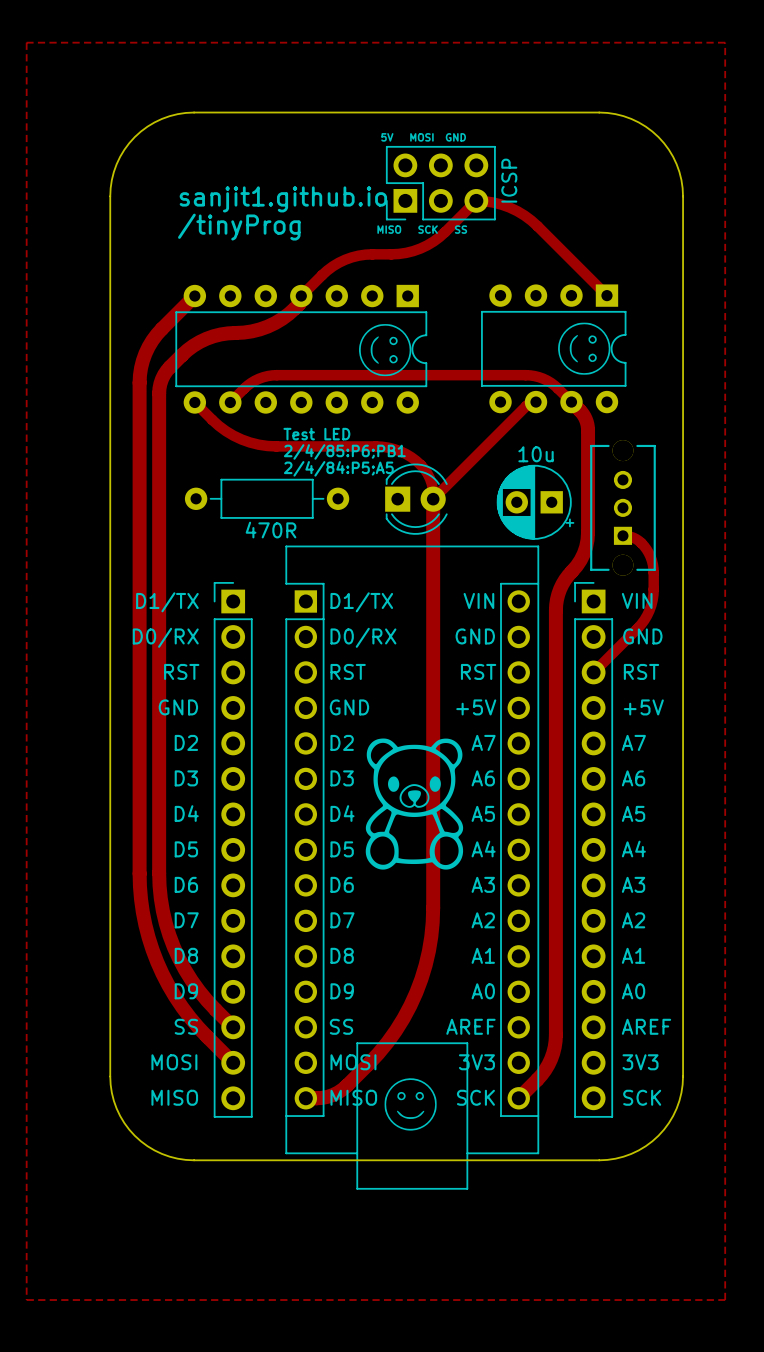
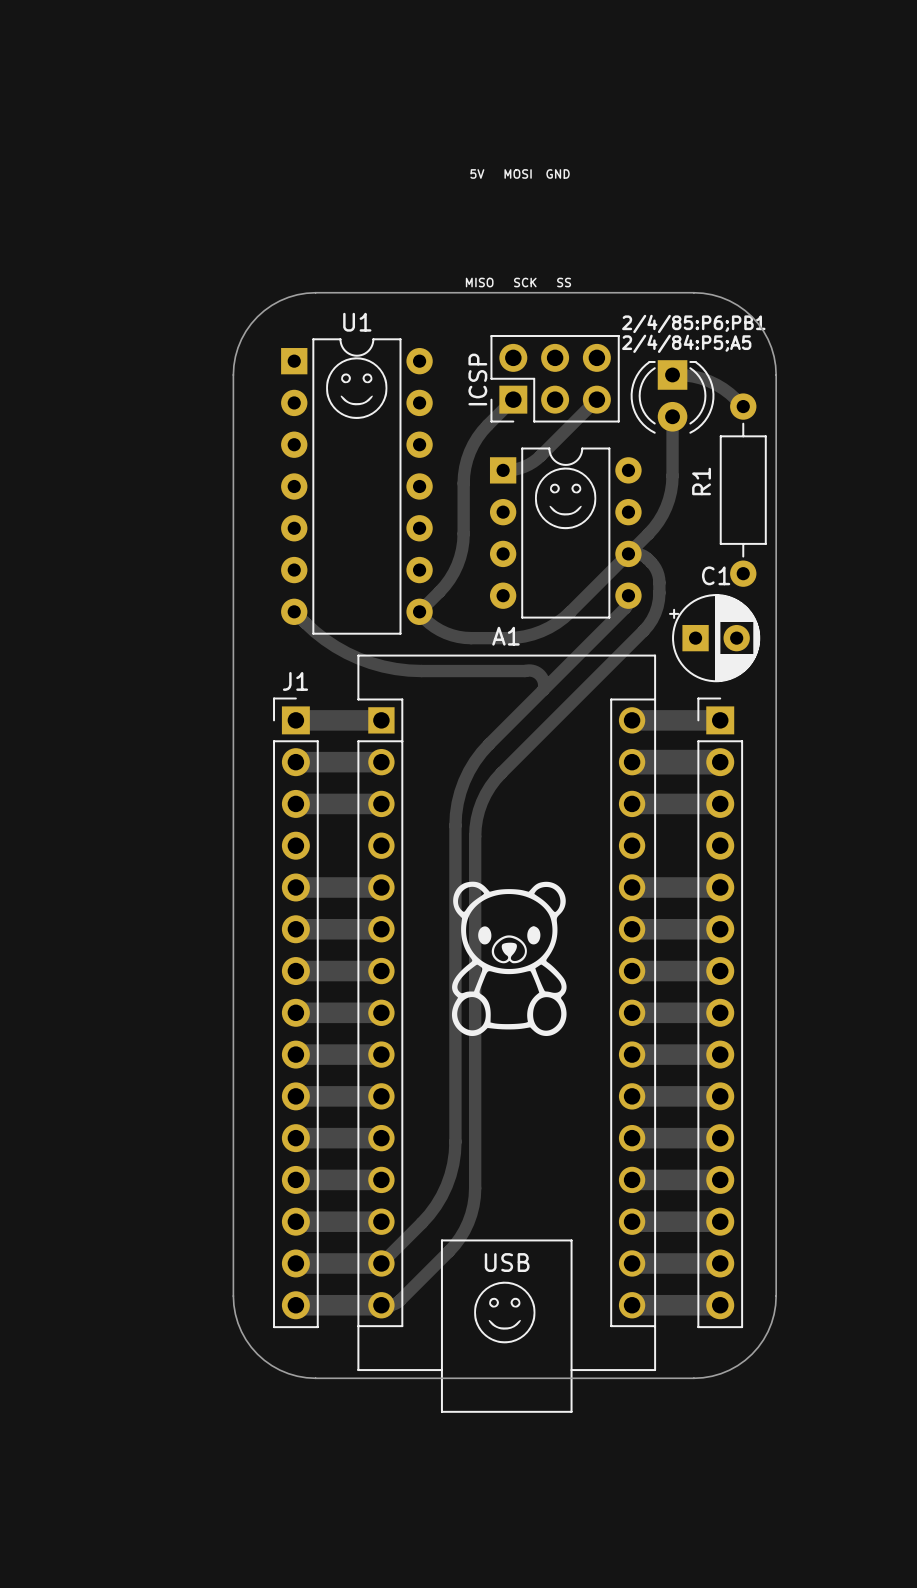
zone outline: (26, 42) (725, 42) (725, 1300) (26, 1300) (26, 42) -> none
part value position: ICSP (509, 180) -> ICSP (477, 379)
part position: (440, 183) -> (555, 378)
text: sanjit1.github.io (283, 199) -> none
text: /tinyProg (239, 227) -> none
drawing: none -> [326, 357, 388, 419]
track: (606, 295) (524, 215) (501, 204) (476, 200) (439, 237) (427, 245) (406, 252) (365, 254) (338, 262) (322, 275) (302, 294) (299, 304) (282, 318) (259, 329) (220, 334) (199, 341) (181, 355) (164, 374) (159, 393) (159, 873) (160, 898) (169, 935) (185, 969) (207, 1000) (233, 1027) -> (381, 1221) (295, 1221)
track: (194, 296) (152, 340) (145, 353) (139, 375) (139, 886) (148, 937) (168, 985) (189, 1017) (233, 1062) -> (387, 1263) (295, 1263)
track: none -> (672, 374) (693, 376) (709, 381) (723, 388) (743, 406)
drawing: [558, 322, 611, 375] -> none
drawing: [359, 324, 412, 377] -> none
track: none -> (513, 399) (482, 431) (469, 451) (464, 475) (463, 533) (460, 557) (453, 572) (444, 585) (419, 611) (434, 627) (458, 636) (515, 637) (533, 634) (549, 627) (570, 611) (648, 533) (662, 514) (670, 491) (672, 416)
track: none -> (596, 399) (537, 459) (520, 468) (503, 470)
part rotation: 0° (553, 348) -> 90° counterclockwise (565, 533)
part position: (553, 348) -> (565, 533)
part: (301, 349) -> none
drawing: none -> [534, 467, 597, 530]
track: (194, 402) (225, 431) (241, 439) (258, 444) (375, 446) (400, 451) (416, 460) (427, 473) (432, 489) (432, 500) -> none
U1: none -> (356, 486)
track: (536, 402) (526, 406) (433, 499) (433, 907) (428, 951) (421, 978) (410, 1005) (387, 1042) (342, 1089) (327, 1096) (311, 1098) -> (628, 553) (644, 556) (657, 571) (659, 582) (658, 599) (652, 619) (643, 630) (501, 773) (485, 794) (479, 810) (475, 836) (475, 1188) (473, 1205) (464, 1230) (454, 1245) (398, 1301) (388, 1305)
track: (571, 402) (583, 414) (587, 427) (588, 532) (583, 553) (562, 584) (556, 604) (555, 1041) (553, 1053) (545, 1070) (518, 1098) -> (720, 1305) (632, 1305)
track: (571, 402) (551, 382) (530, 375) (276, 375) (254, 380) (230, 402) -> none
R1: none -> (743, 490)
text: Test LED (316, 434) -> none
text position: 2/4/85:P6;PB1 (344, 451) -> 2/4/85:P6;PB1 (693, 323)
text position: 2/4/84:P5;A5 (338, 468) -> 2/4/84:P5;A5 (686, 343)
track: none -> (628, 595) (628, 603) (625, 608) (481, 752) (464, 781) (457, 803) (455, 825) (455, 1141) (453, 1164) (446, 1185) (436, 1205) (421, 1223) (381, 1263)
part: 470R (267, 498) -> none
part rotation: 0° (416, 499) -> 90° clockwise (672, 396)
part position: (416, 499) -> (672, 396)
part: 10u (535, 502) -> none
part: (622, 507) -> none
track: none -> (294, 611) (324, 639) (346, 653) (370, 662) (408, 670) (532, 670) (542, 677) (543, 689)
A1 name: none -> A1 (505, 636)
C1: none -> (714, 638)
track: (622, 535) (638, 540) (650, 556) (653, 572) (652, 600) (647, 615) (641, 624) (593, 672) -> (632, 803) (720, 803)
J1 name: none -> J1 (295, 681)
text: VIN (478, 600) -> none
text: VIN (637, 600) -> none
track: none -> (295, 720) (381, 720)
track: none -> (632, 720) (720, 720)
text: D1/TX (167, 602) -> none
text: D1/TX (361, 602) -> none
track: none -> (295, 762) (381, 762)
text: GND (475, 636) -> none
track: none -> (632, 762) (720, 762)
text: GND (642, 636) -> none
text: D0/RX (165, 637) -> none
text: D0/RX (363, 637) -> none
text: RST (181, 671) -> none
text: RST (348, 671) -> none
text: RST (478, 671) -> none
text: RST (641, 671) -> none
track: none -> (295, 803) (381, 803)
text: GND (178, 707) -> none
text: GND (349, 707) -> none
text: +5V (476, 707) -> none
text: +5V (643, 707) -> none
text: D2 (186, 742) -> none
text: D2 (342, 742) -> none
text: A7 (483, 742) -> none
text: A7 (633, 742) -> none
track: none -> (295, 887) (381, 887)
track: none -> (632, 887) (720, 887)
text: D3 (186, 778) -> none
track: none -> (295, 929) (381, 929)
text: D3 (342, 778) -> none
text: A6 (483, 778) -> none
track: none -> (632, 929) (720, 929)
text: A6 (633, 778) -> none
text: D4 (186, 813) -> none
text: D4 (342, 813) -> none
text: A5 (483, 813) -> none
text: A5 (633, 813) -> none
track: none -> (295, 971) (381, 971)
track: none -> (632, 971) (720, 971)
text: D5 (186, 849) -> none
track: none -> (295, 1012) (381, 1012)
text: D5 (342, 849) -> none
text: A4 (483, 849) -> none
track: none -> (632, 1012) (720, 1012)
text: A4 (633, 849) -> none
text: D6 (186, 884) -> none
text: D6 (342, 884) -> none
text: A3 (483, 884) -> none
text: A3 (633, 884) -> none
track: none -> (295, 1054) (381, 1054)
track: none -> (632, 1054) (720, 1054)
text: D7 (186, 920) -> none
track: none -> (295, 1096) (381, 1096)
text: D7 (342, 920) -> none
text: A2 (483, 920) -> none
track: none -> (632, 1096) (720, 1096)
text: A2 (633, 920) -> none
text: D8 (186, 955) -> none
text: D8 (342, 955) -> none
text: A1 (483, 955) -> none
text: A1 (633, 955) -> none
track: none -> (295, 1138) (381, 1138)
track: none -> (632, 1138) (720, 1138)
text: D9 (186, 991) -> none
track: none -> (295, 1179) (381, 1179)
text: D9 (342, 991) -> none
text: A0 (483, 991) -> none
track: none -> (632, 1179) (720, 1179)
text: A0 (633, 991) -> none
text: SS (186, 1026) -> none
text: SS (341, 1026) -> none
text: AREF (470, 1026) -> none
text: AREF (646, 1026) -> none
track: none -> (632, 1221) (720, 1221)
A1 text: none -> USB (507, 1262)
text: MOSI (174, 1062) -> none
text: MOSI (353, 1062) -> none
text: 3V3 (476, 1062) -> none
track: none -> (632, 1263) (720, 1263)
text: 3V3 (640, 1062) -> none
text: MISO (174, 1097) -> none
text: MISO (353, 1097) -> none
text: SCK (475, 1097) -> none
text: SCK (642, 1097) -> none
track: none -> (295, 1305) (381, 1305)
board edge: (249, 1160) (185, 1159) (169, 1156) (154, 1150) (134, 1135) (124, 1123) (113, 1100) (110, 1084) (110, 188) (116, 164) (124, 149) (134, 137) (154, 122) (169, 116) (185, 112) (607, 112) (631, 118) (652, 131) (664, 143) (676, 164) (681, 179) (683, 196) (682, 1084) (679, 1100) (673, 1116) (664, 1129) (645, 1146) (631, 1153) (615, 1158) (571, 1160) -> (315, 1378) (288, 1373) (271, 1365) (257, 1354) (241, 1331) (235, 1314) (233, 1296) (233, 365) (241, 339) (257, 316) (279, 300) (297, 294) (315, 292) (703, 293) (721, 297) (745, 310) (763, 331) (771, 347) (776, 374) (775, 1305) (768, 1331) (752, 1354) (729, 1370) (712, 1376) (693, 1378)

